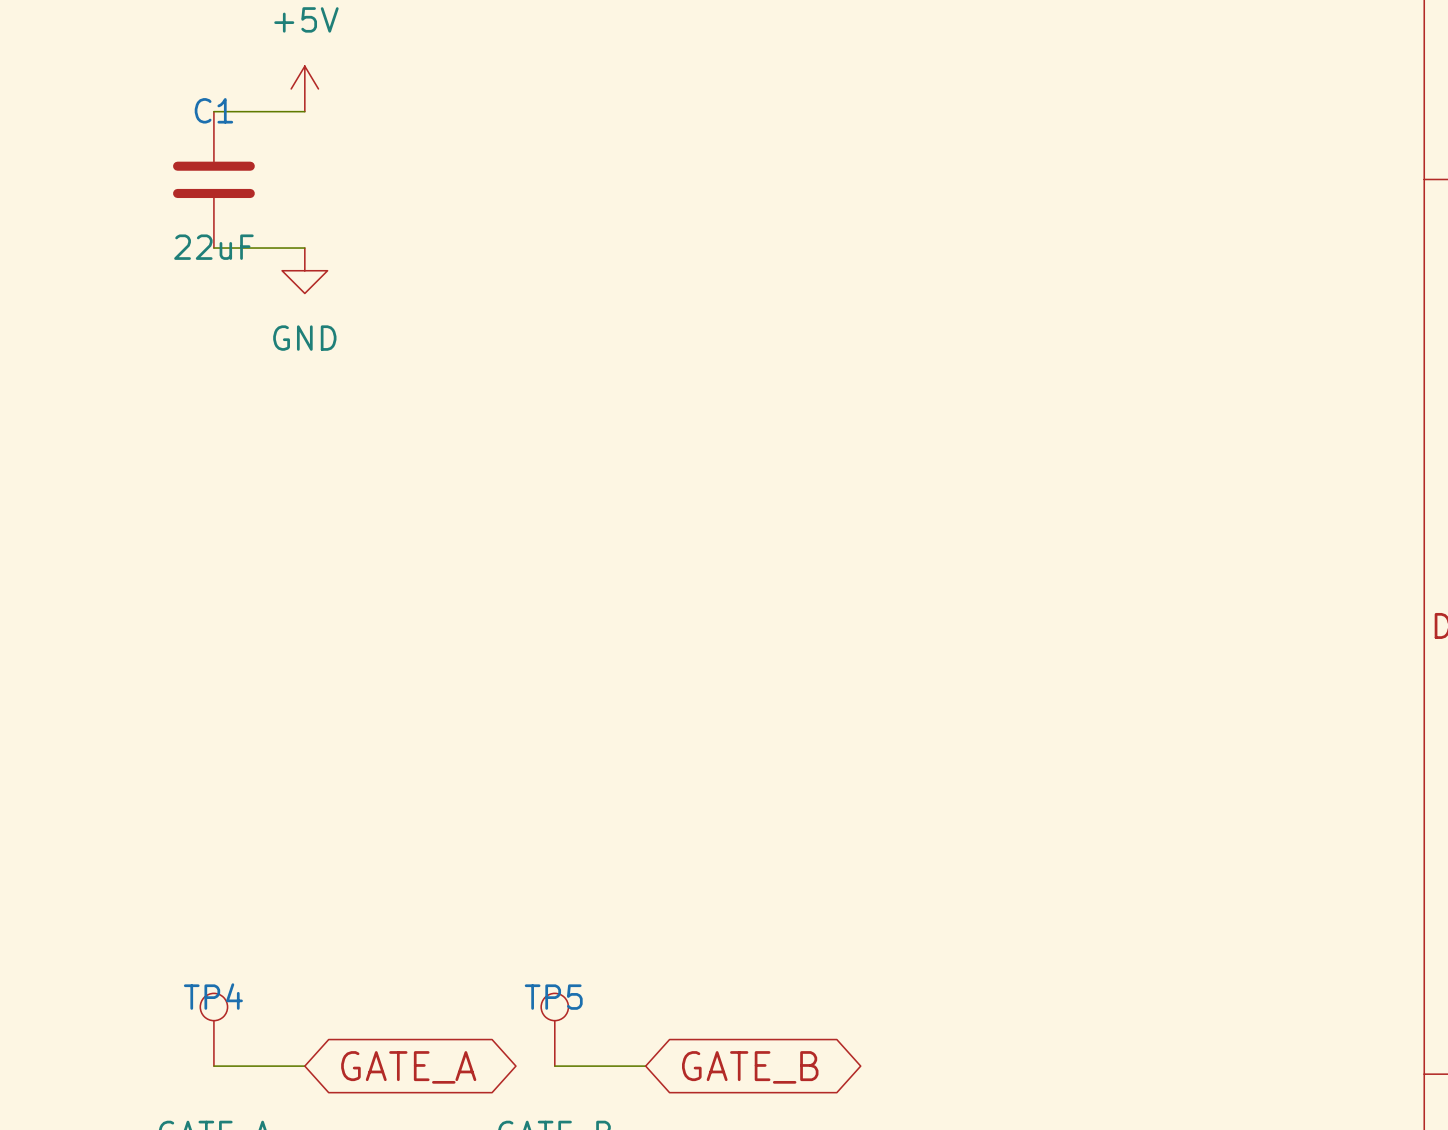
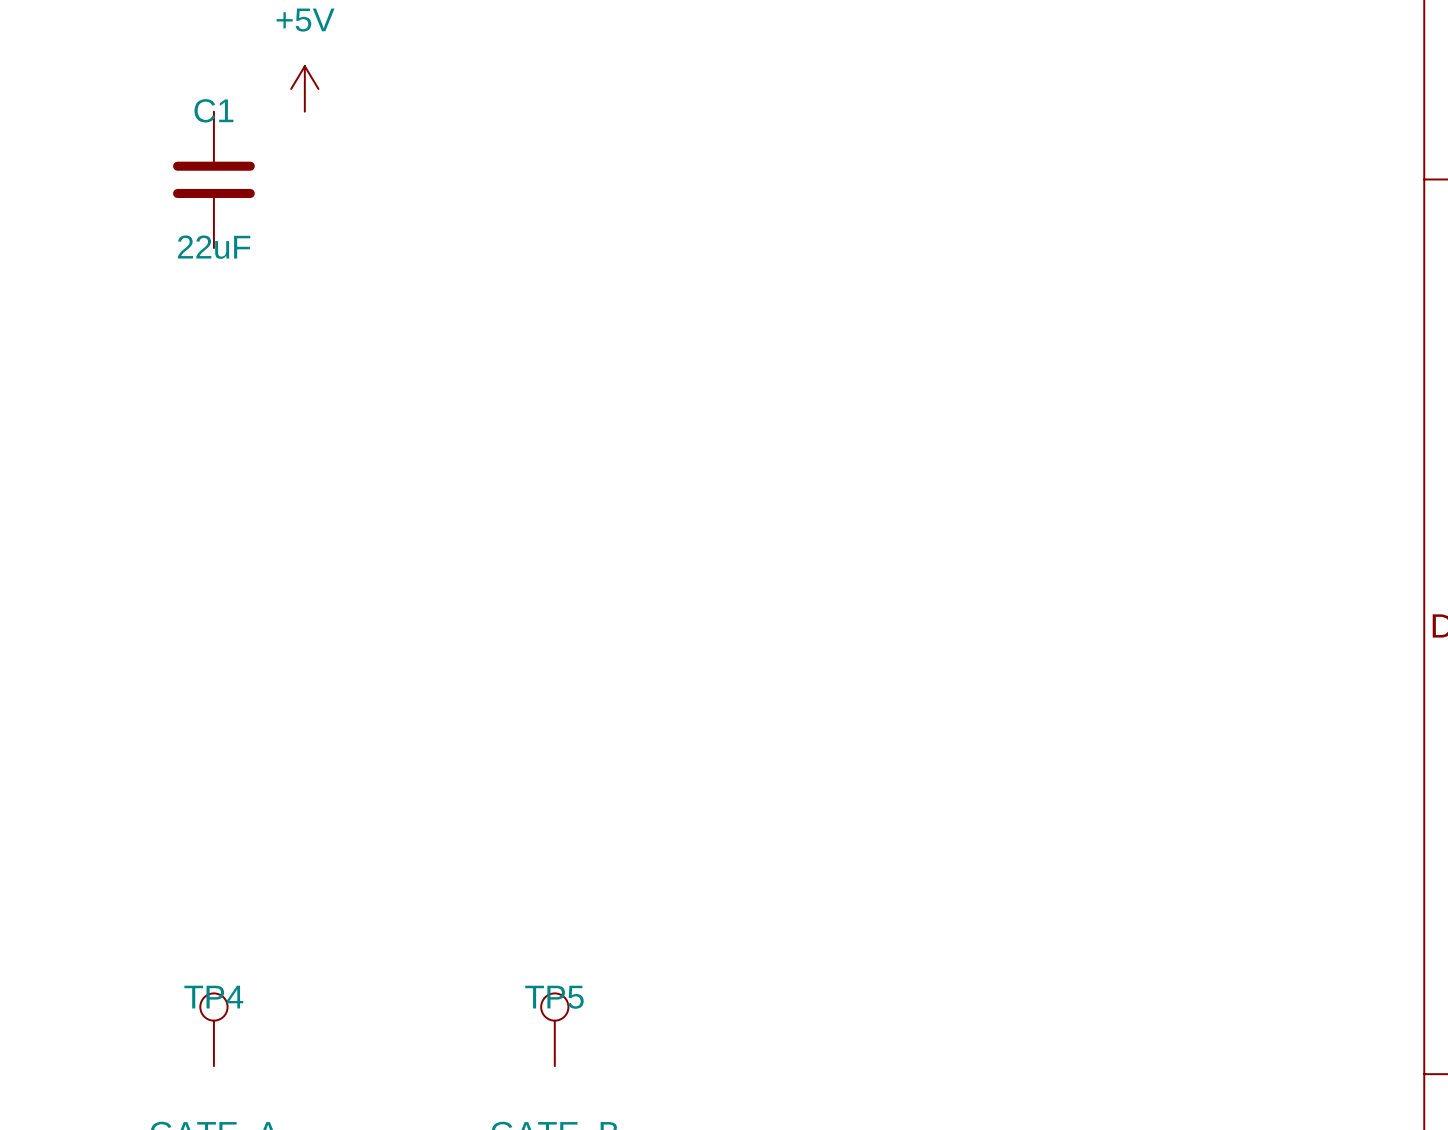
wire: (213, 111) (304, 111) -> none
wire: (213, 248) (304, 248) -> none
power symbol: GND (304, 270) -> none
wire: (213, 1066) (304, 1066) -> none
wire: (554, 1066) (645, 1066) -> none
global label: GATE_A (408, 1067) -> none
global label: GATE_B (750, 1067) -> none

